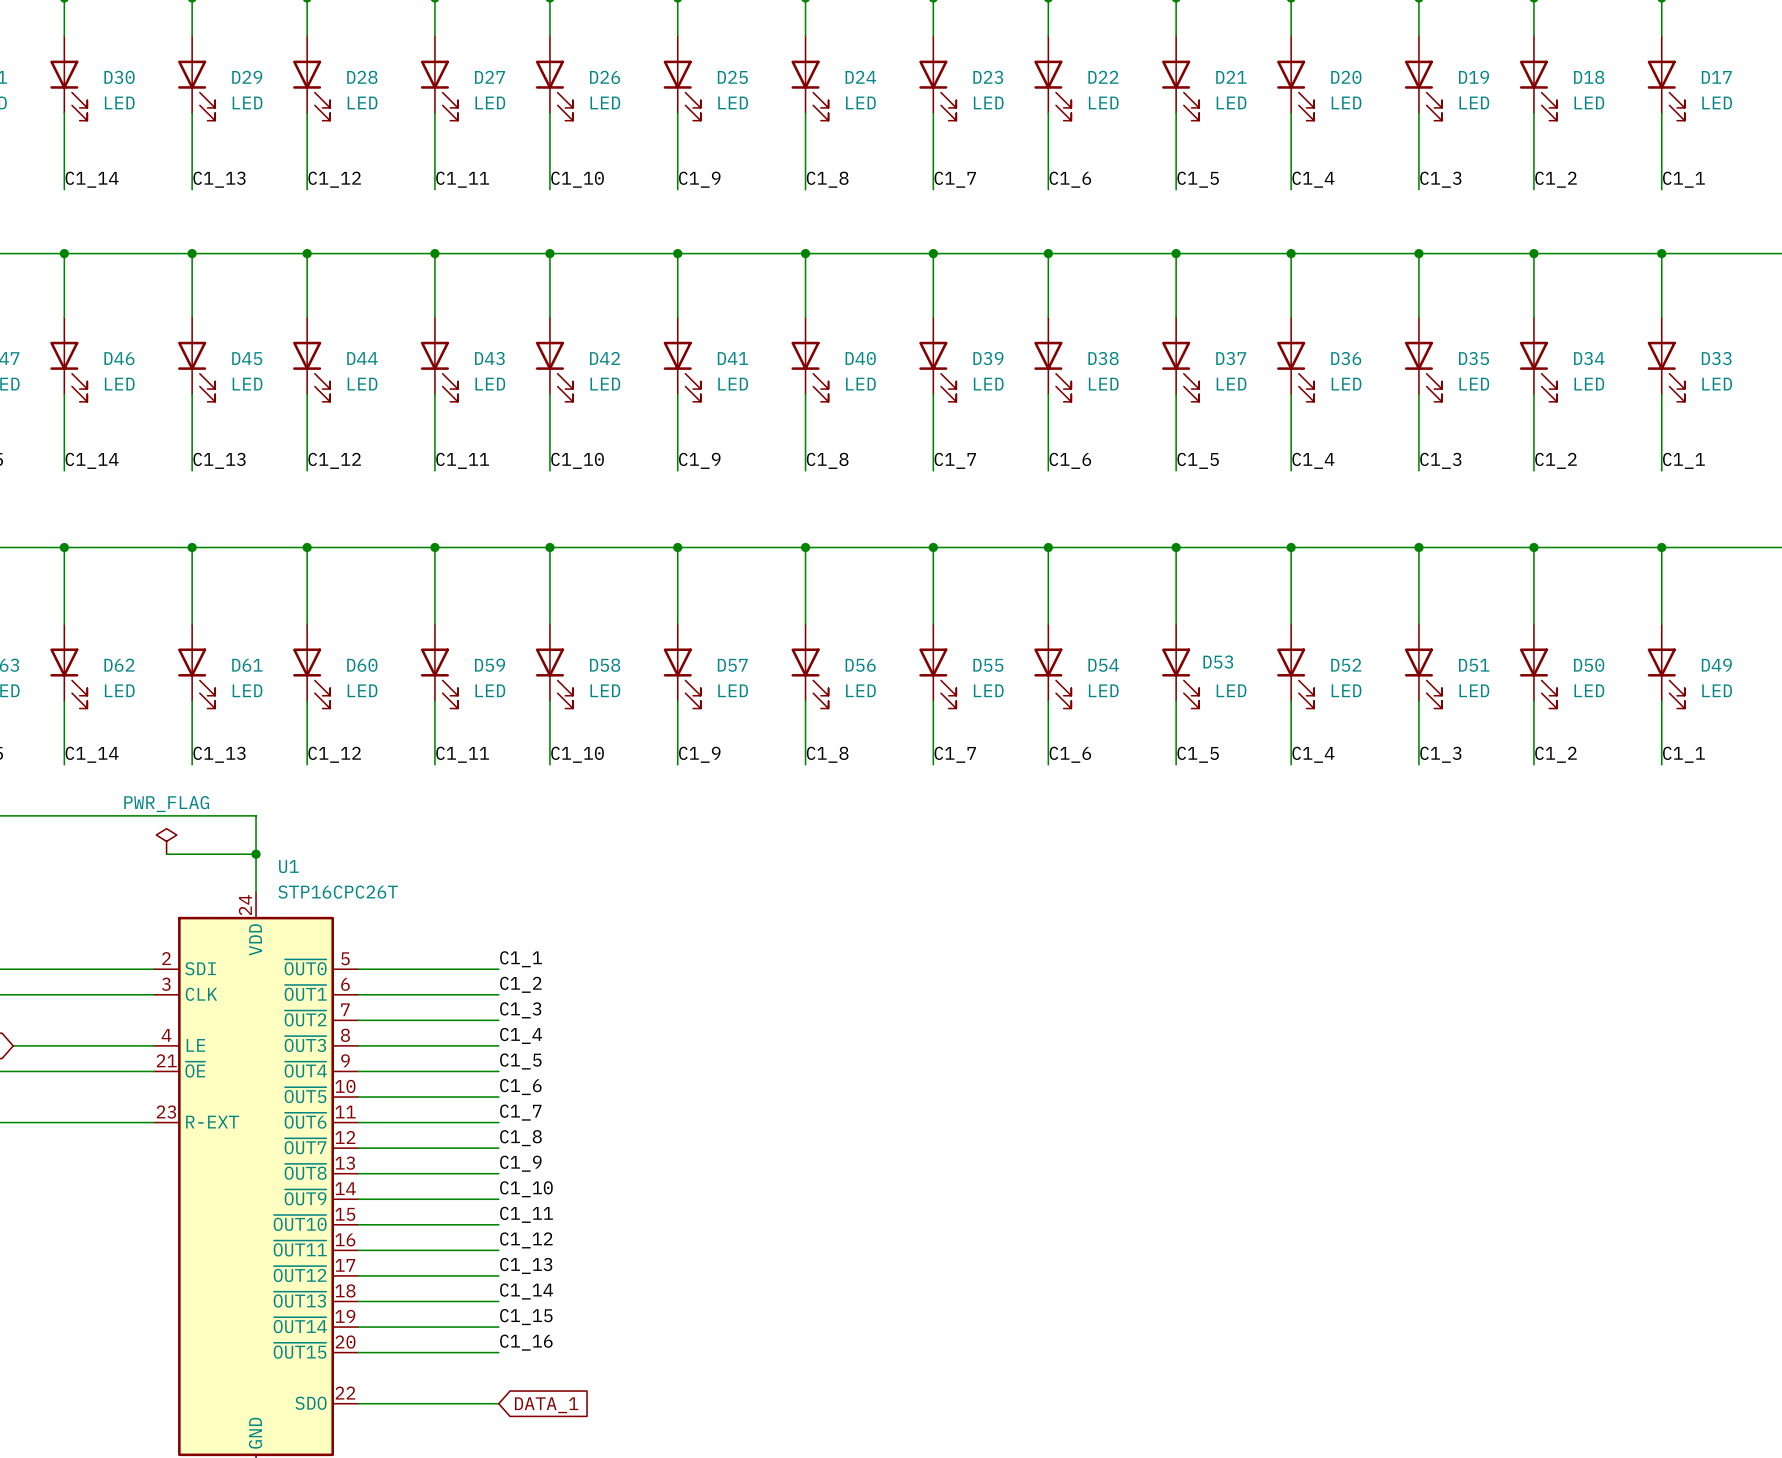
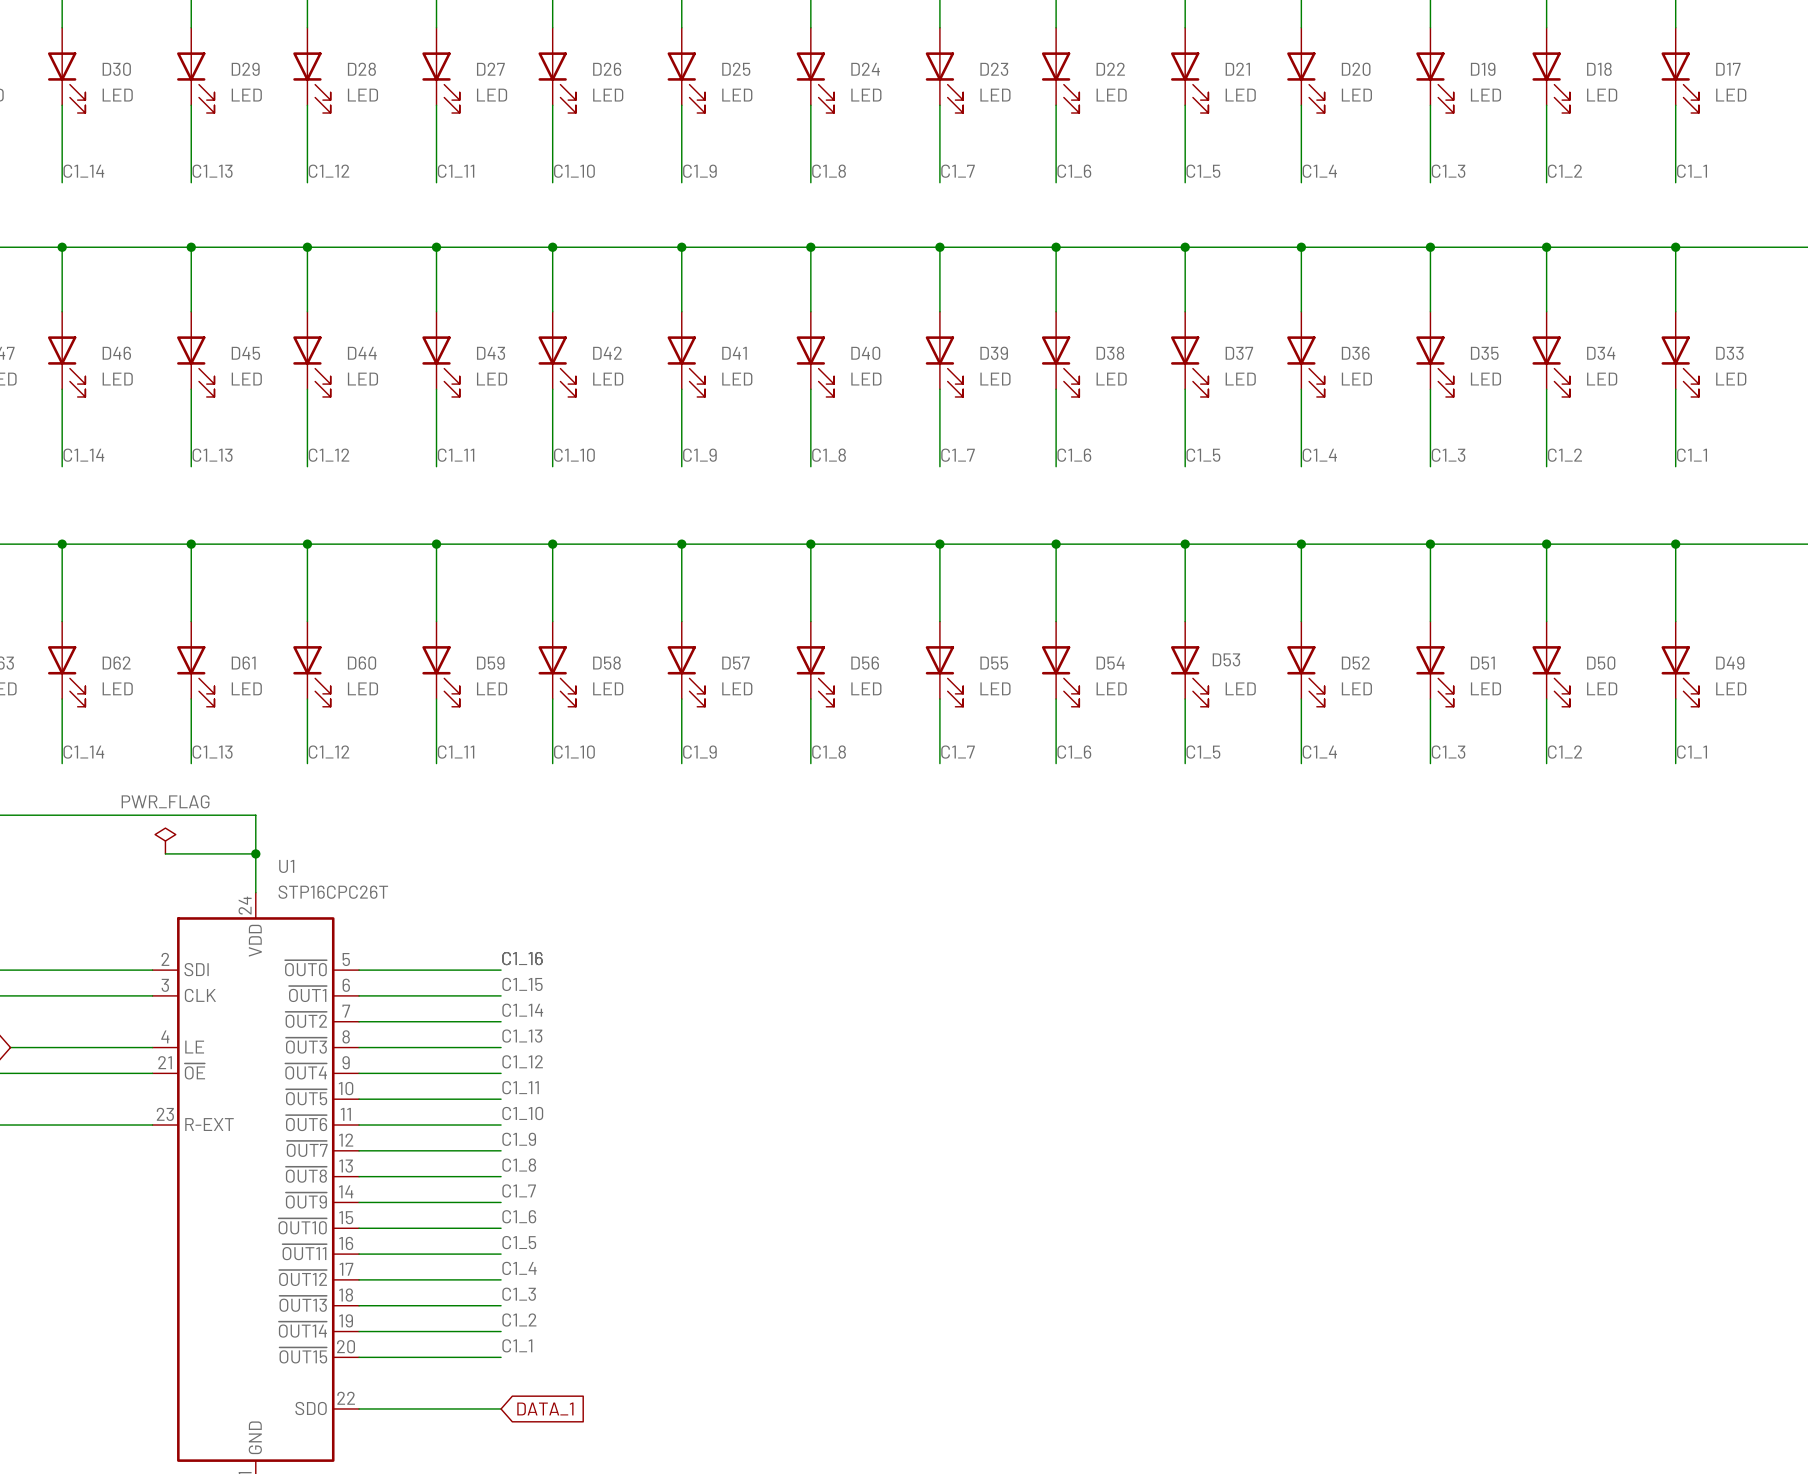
label: C1_1 (521, 959) -> C1_16 (522, 958)
label: C1_2 (520, 984) -> C1_15 (522, 984)
label: C1_3 (520, 1010) -> C1_14 (522, 1010)
label: C1_4 (521, 1035) -> C1_13 (522, 1036)
label: C1_5 (520, 1061) -> C1_12 (522, 1061)
label: C1_6 (520, 1087) -> C1_11 (520, 1087)
label: C1_7 (520, 1112) -> C1_10 (522, 1113)
label: C1_8 (520, 1138) -> C1_9 (519, 1139)
label: C1_9 (520, 1163) -> C1_8 (519, 1165)
label: C1_10 (526, 1189) -> C1_7 (519, 1190)
label: C1_11 (526, 1214) -> C1_6 (519, 1216)
label: C1_12 (526, 1240) -> C1_5 (519, 1242)
label: C1_13 (526, 1265) -> C1_4 (519, 1268)
label: C1_14 (526, 1291) -> C1_3 (519, 1294)
label: C1_15 (526, 1317) -> C1_2 (519, 1320)
label: C1_16 (526, 1342) -> C1_1 (517, 1345)

